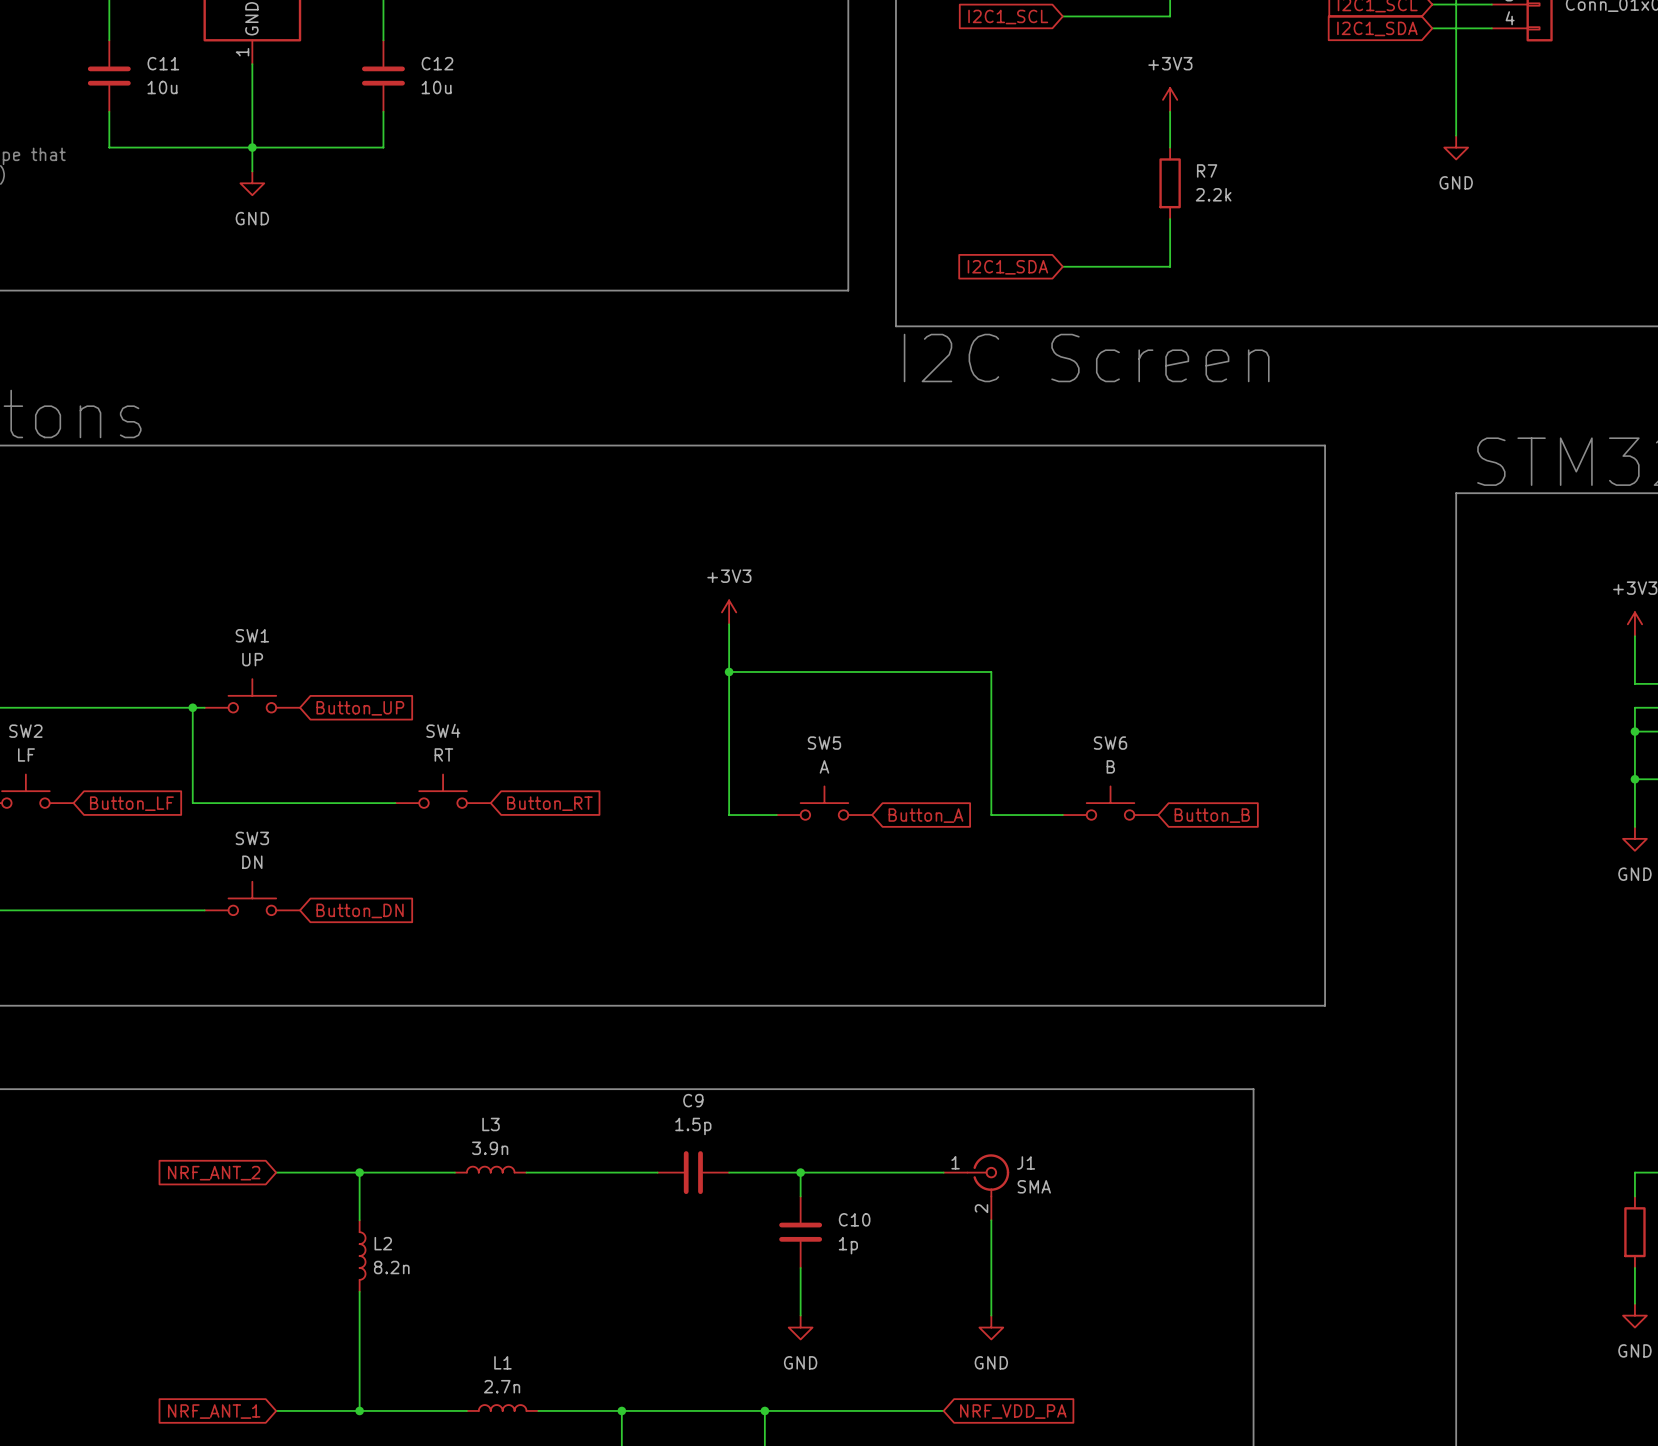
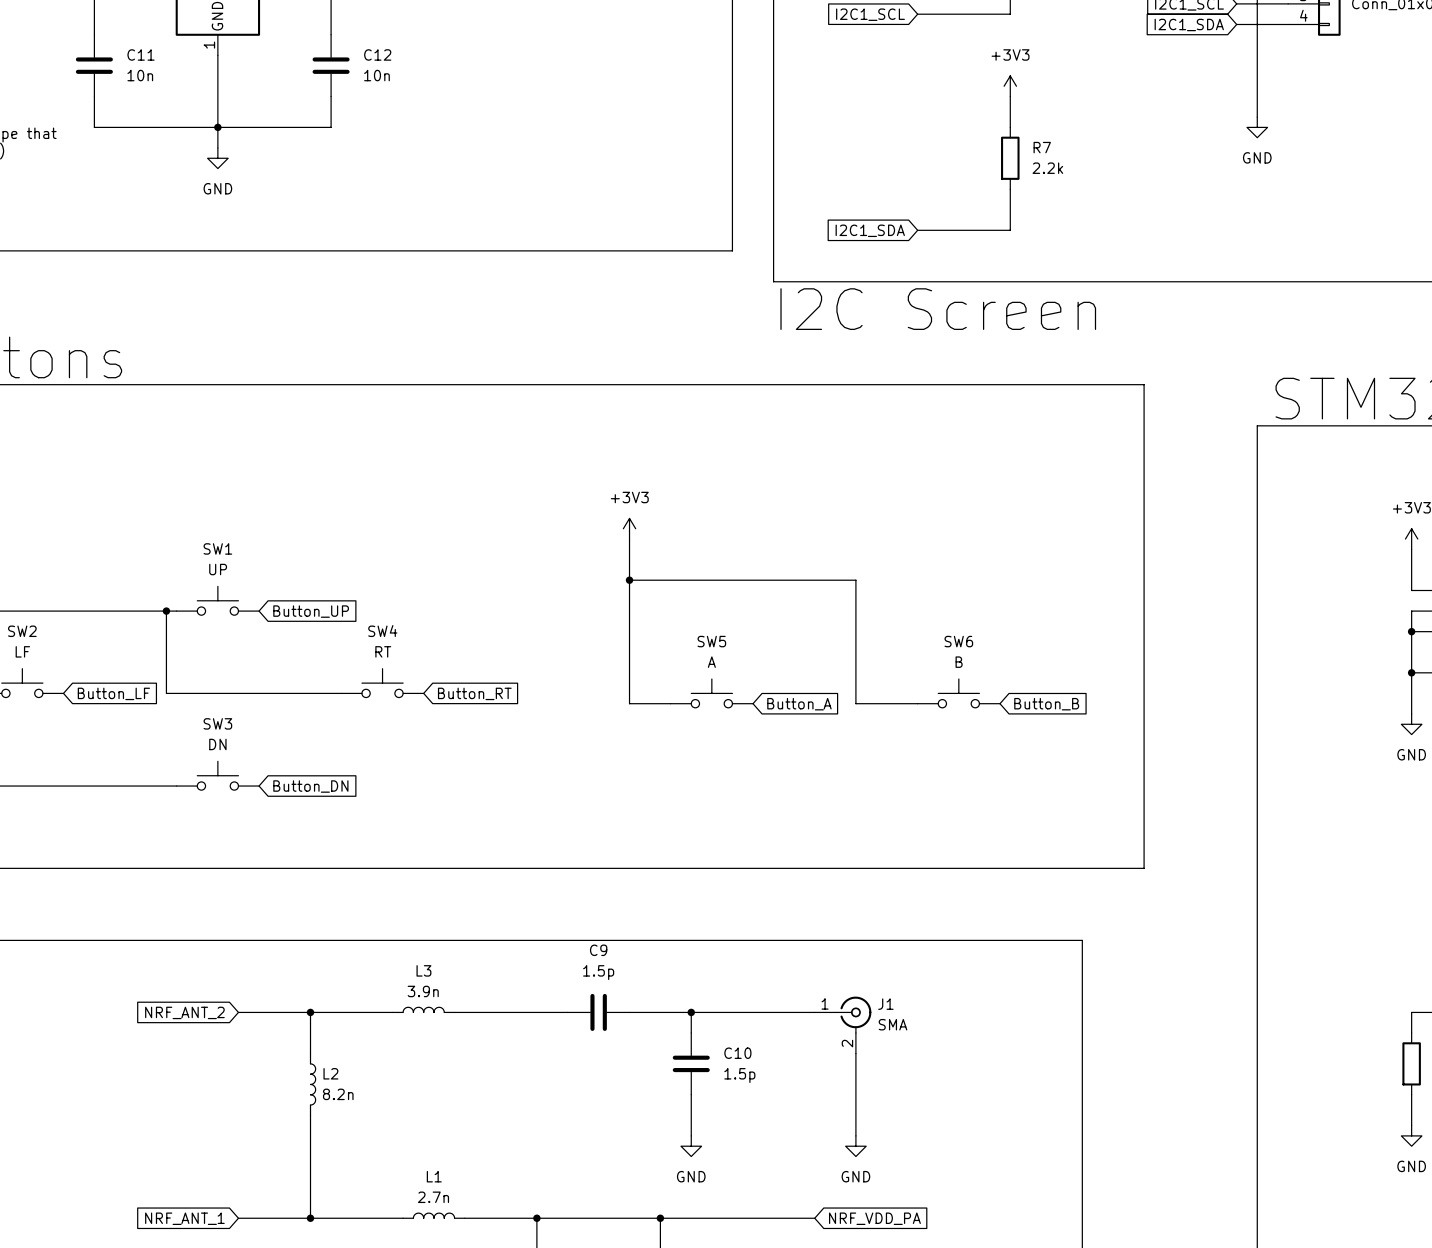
C11 value: 10u (162, 87) -> 10n (140, 75)
C12 value: 10u (436, 87) -> 10n (376, 75)
C10 value: 1p (848, 1245) -> 1.5p (739, 1075)

